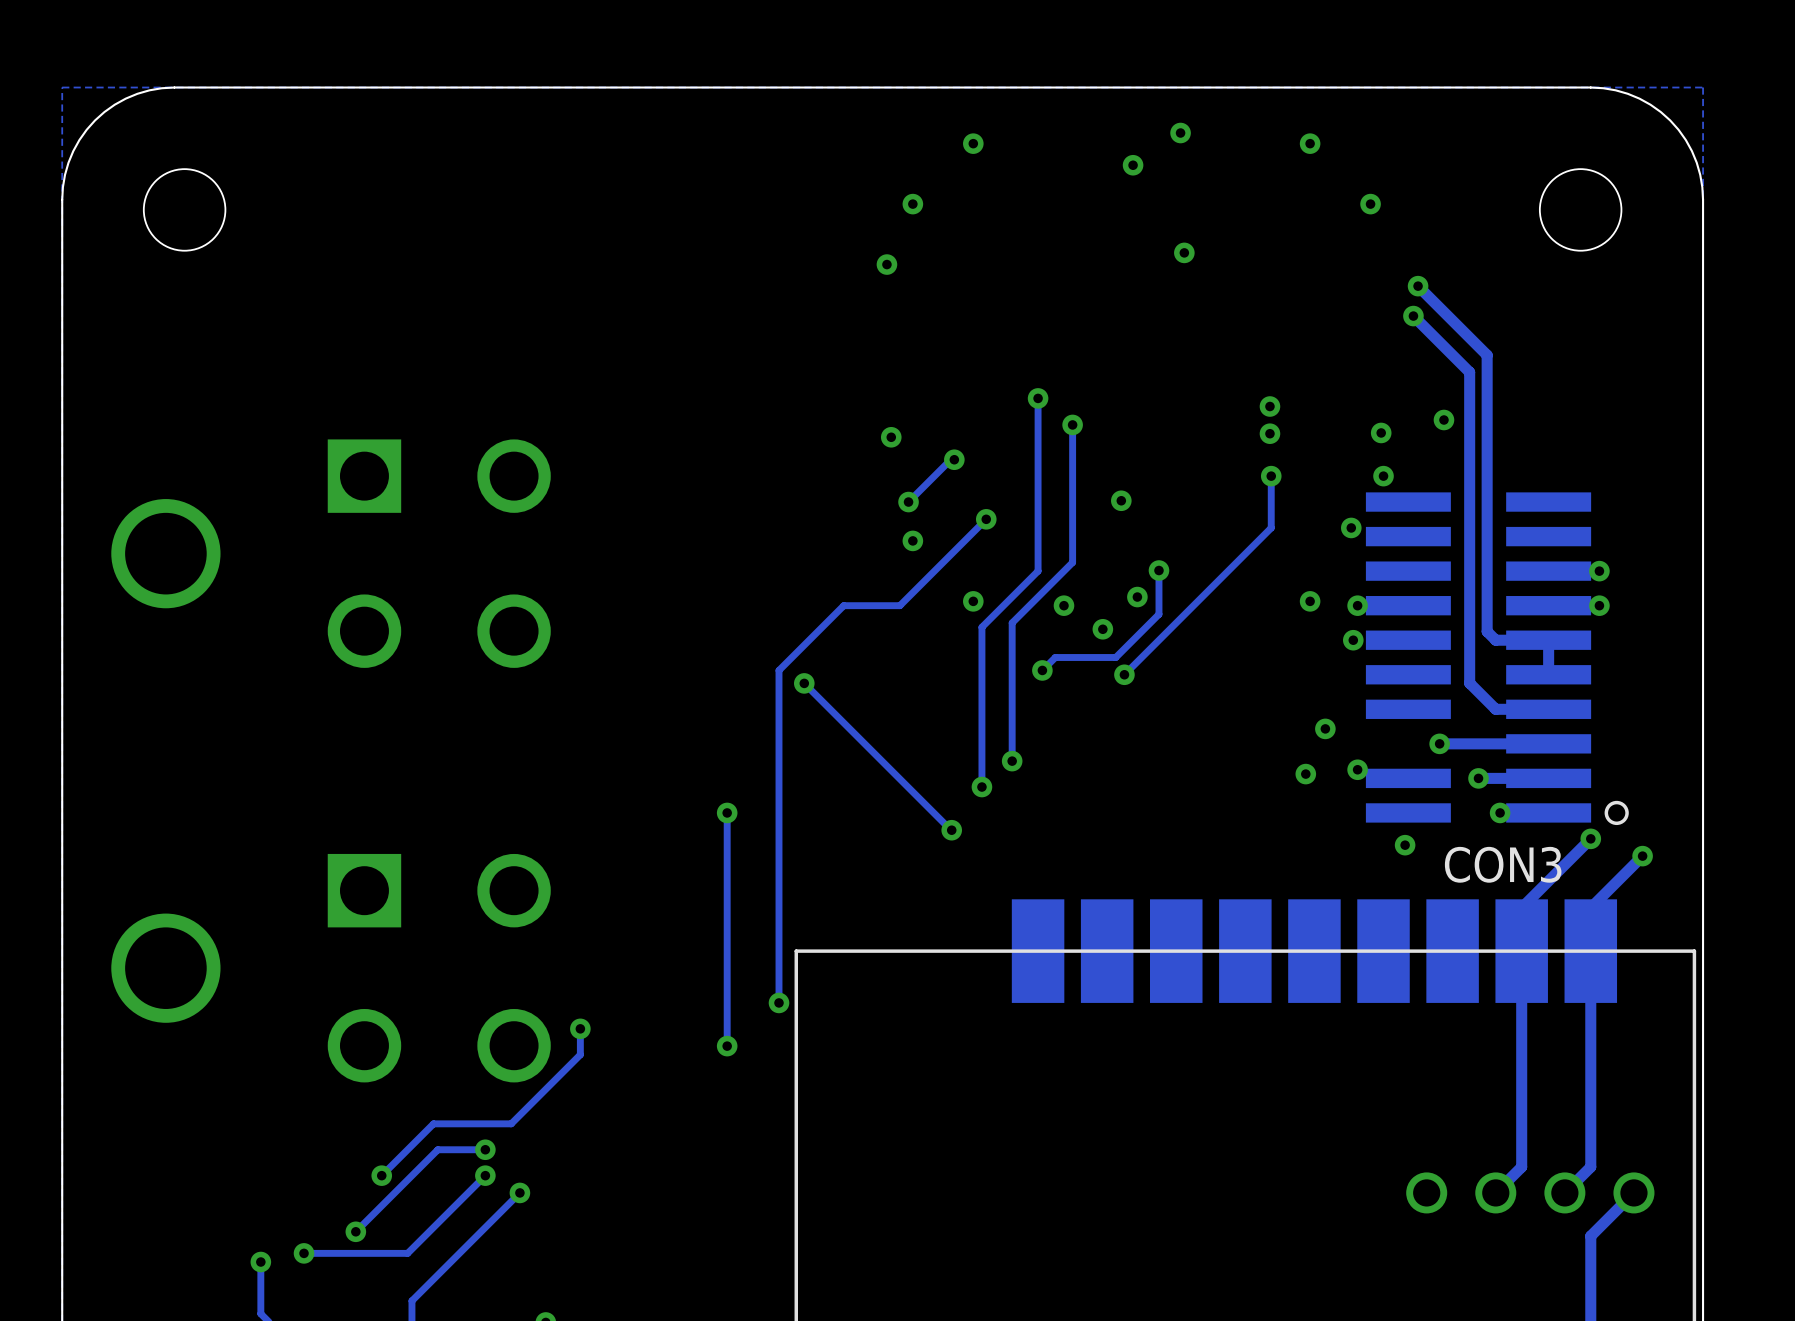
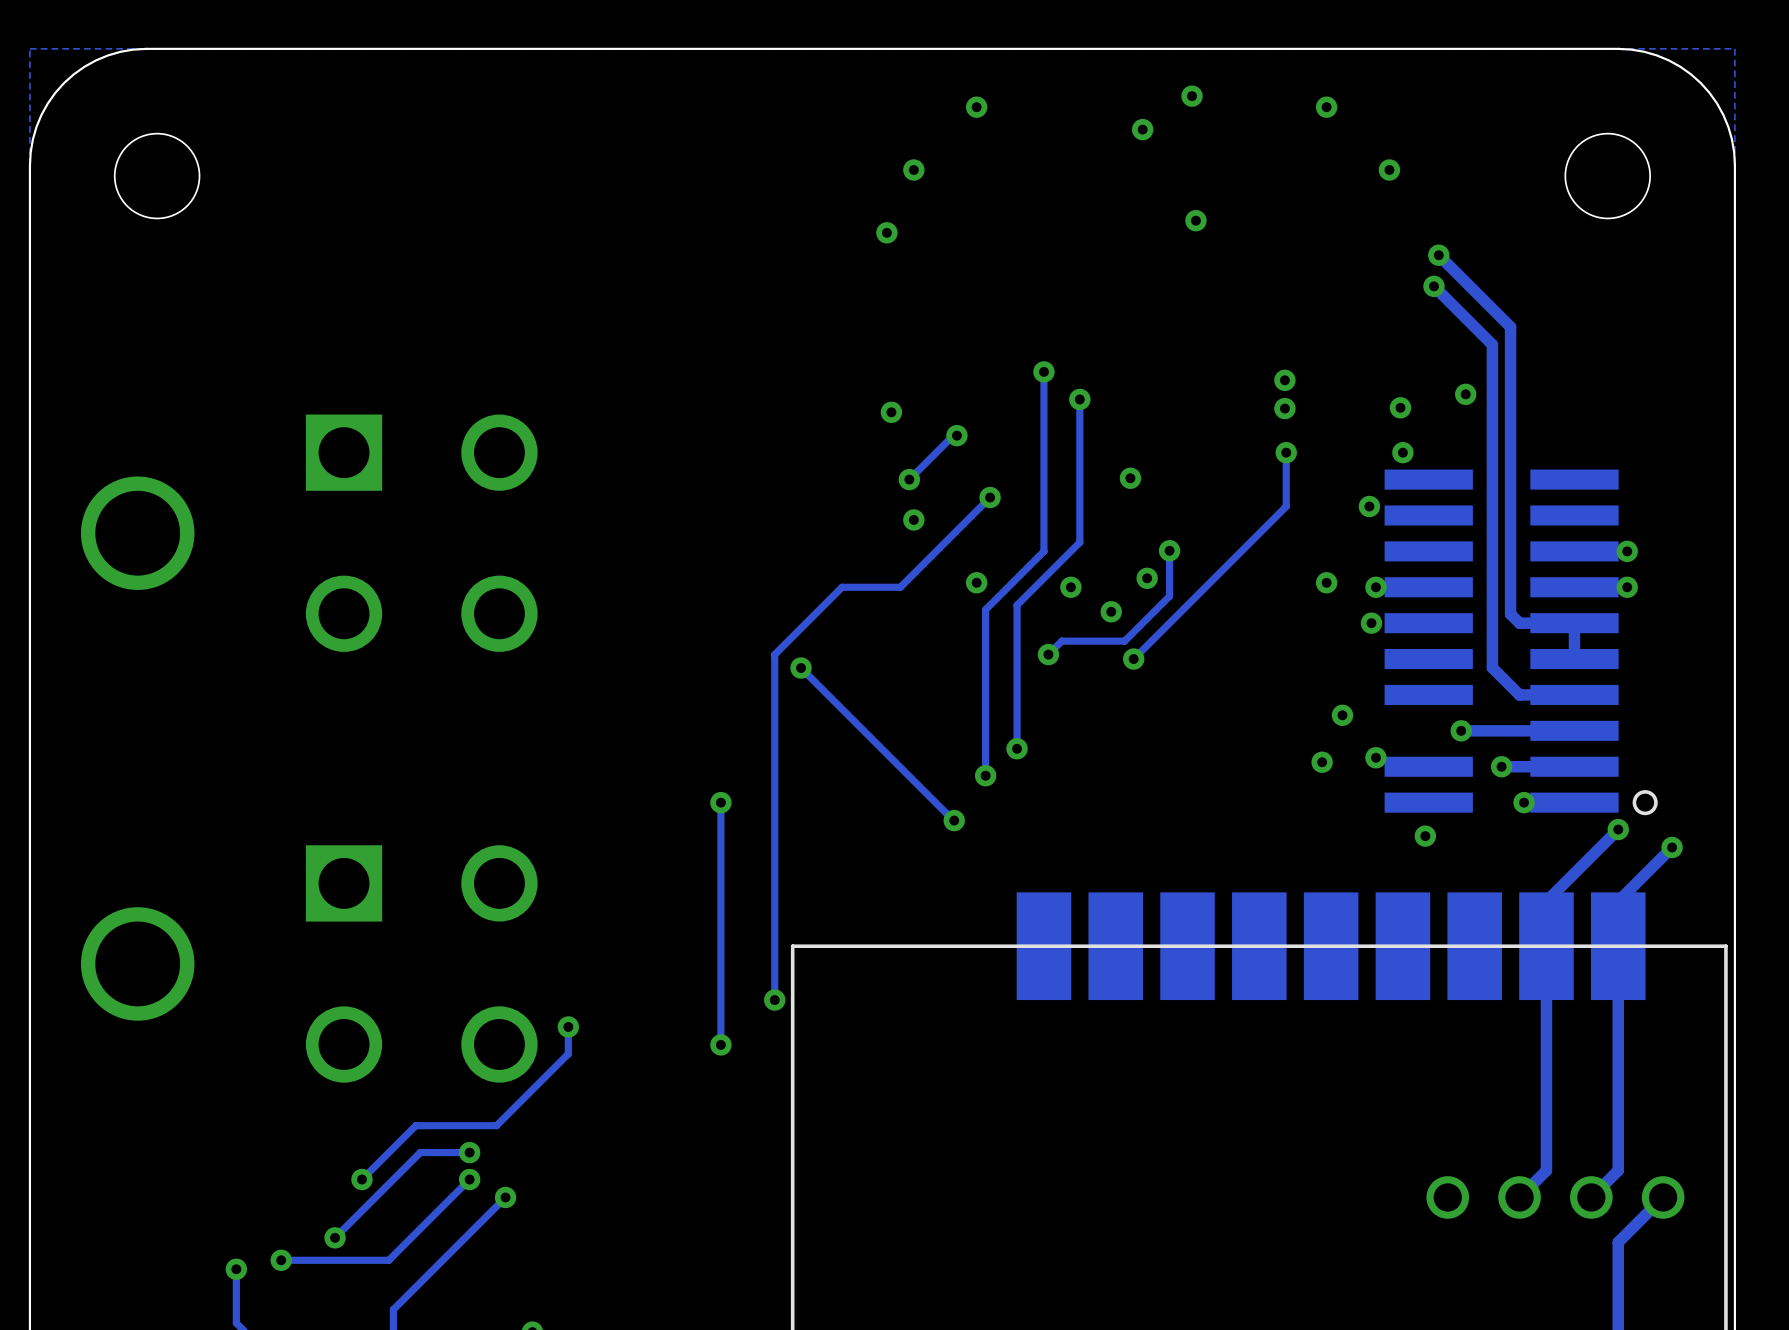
CON3 name: CON3 (1503, 864) -> none

